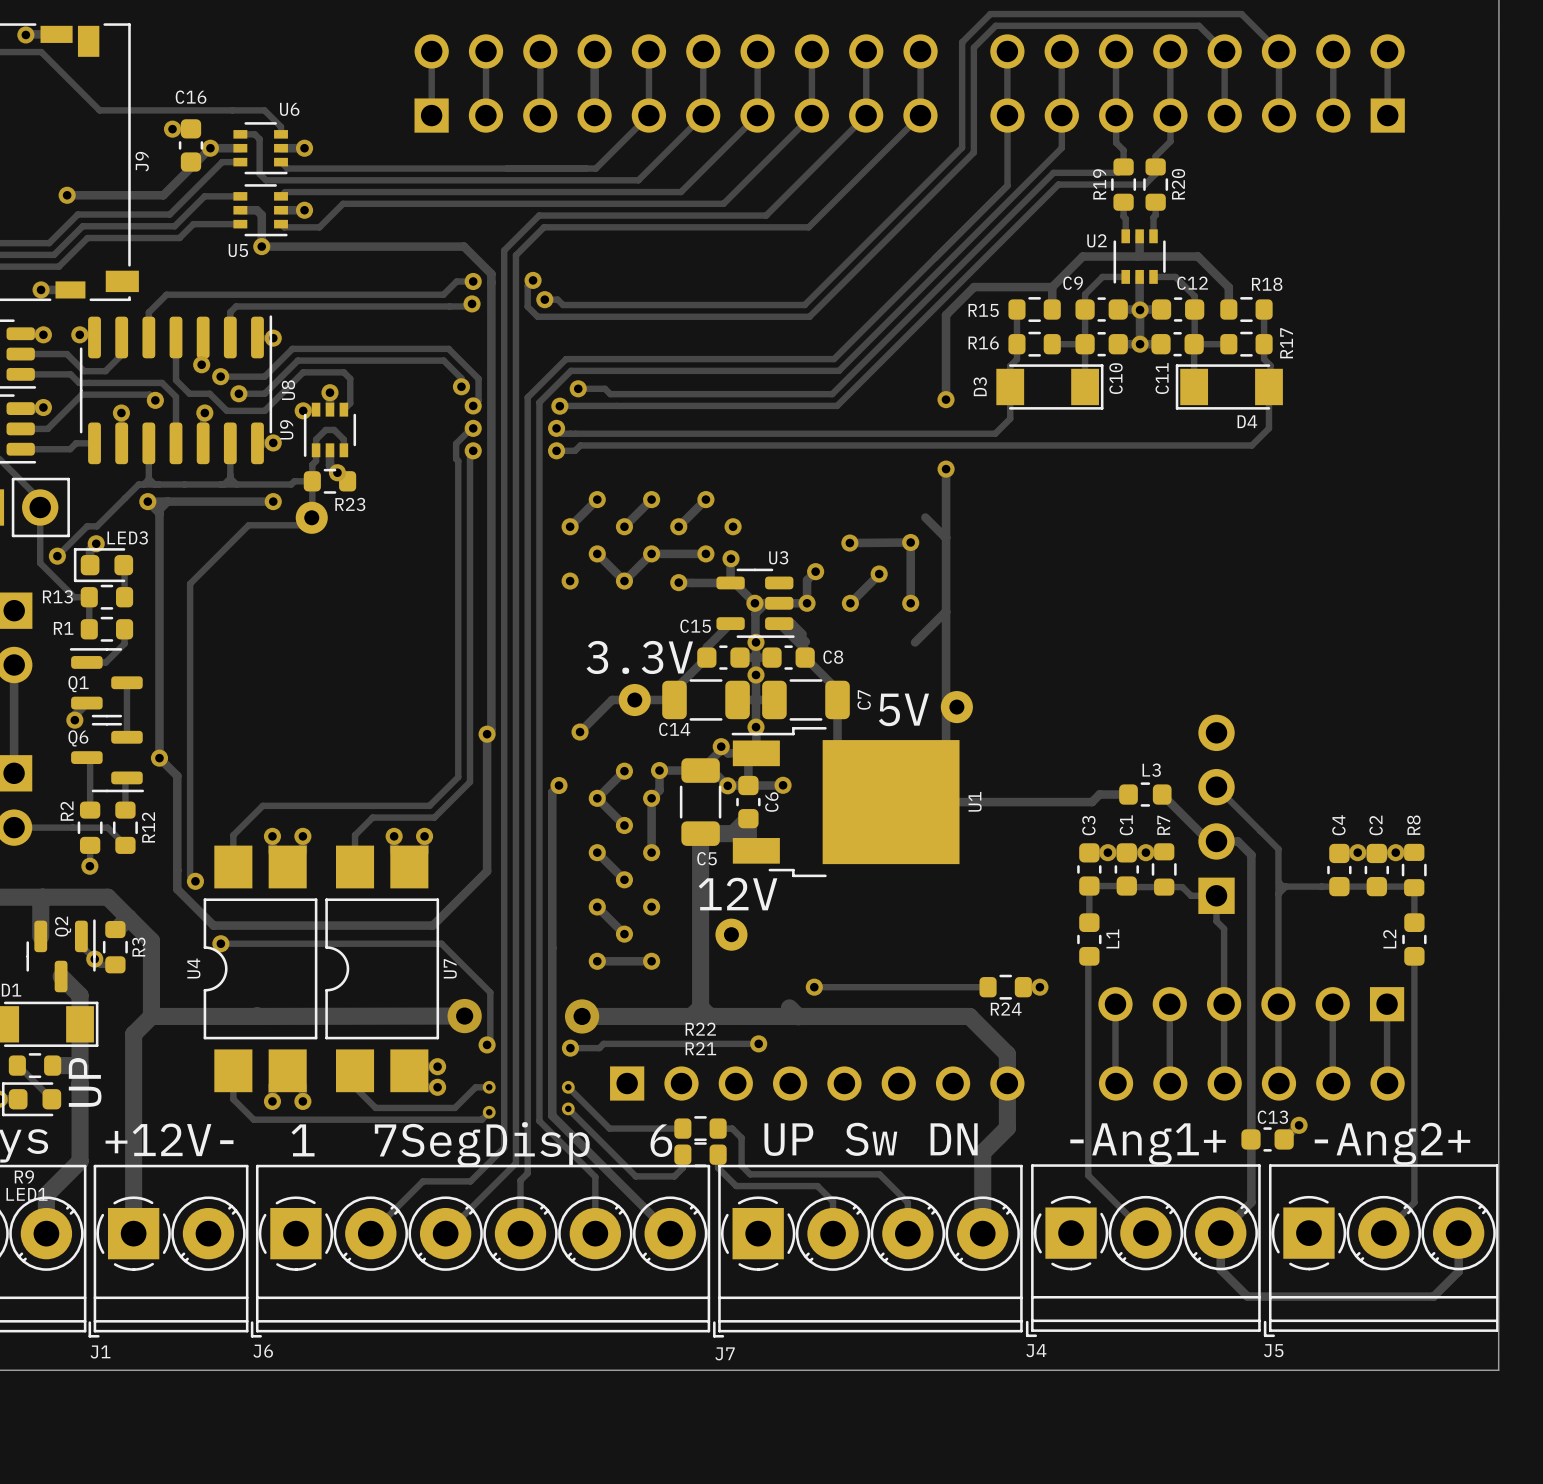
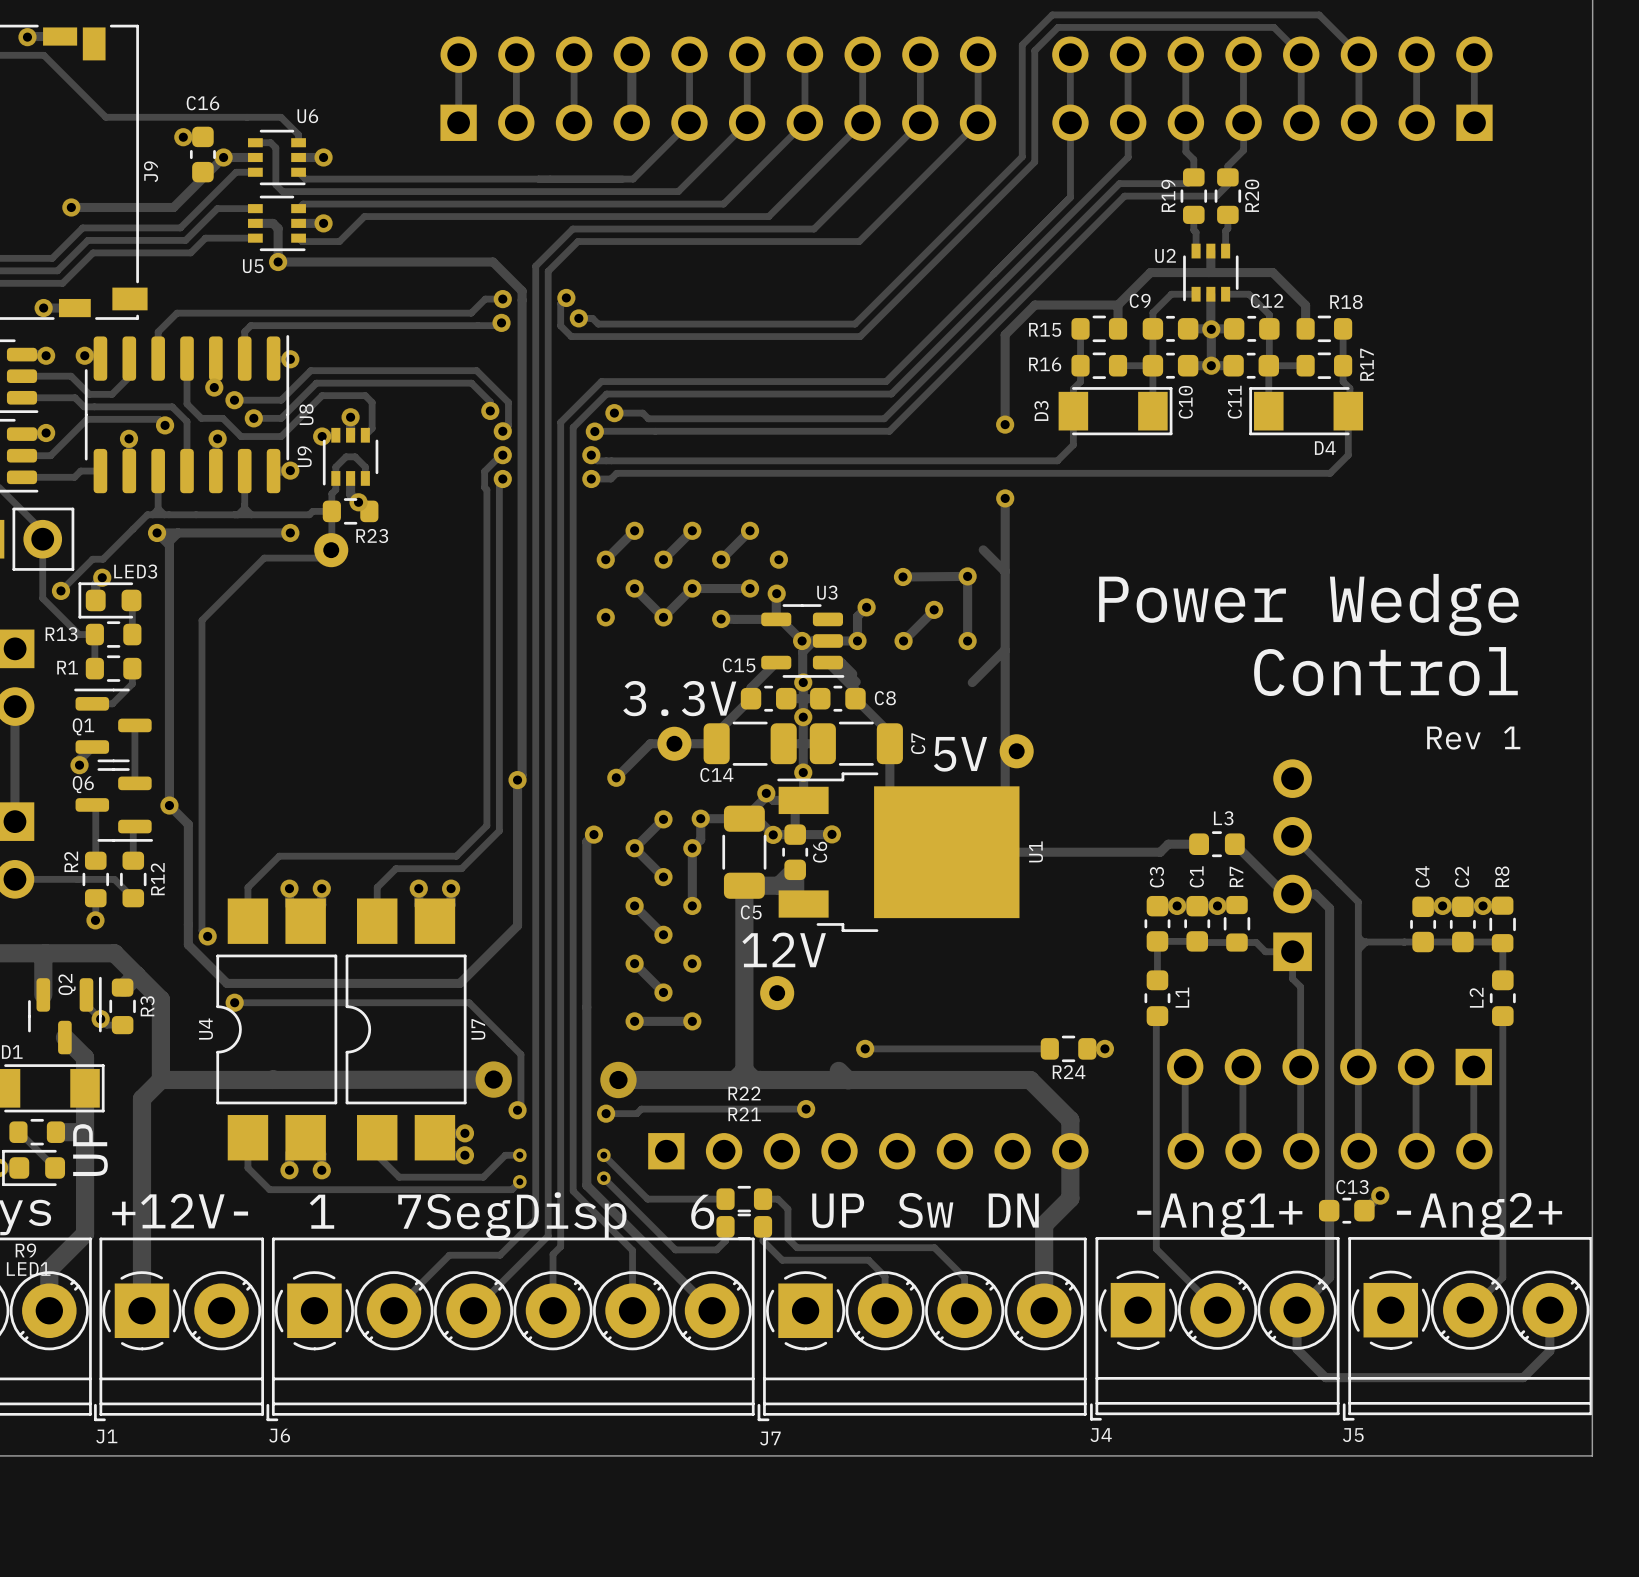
text: none -> Power Wedge (1308, 604)
text: none -> Control (1385, 671)
text: none -> Rev 1 (1473, 738)

